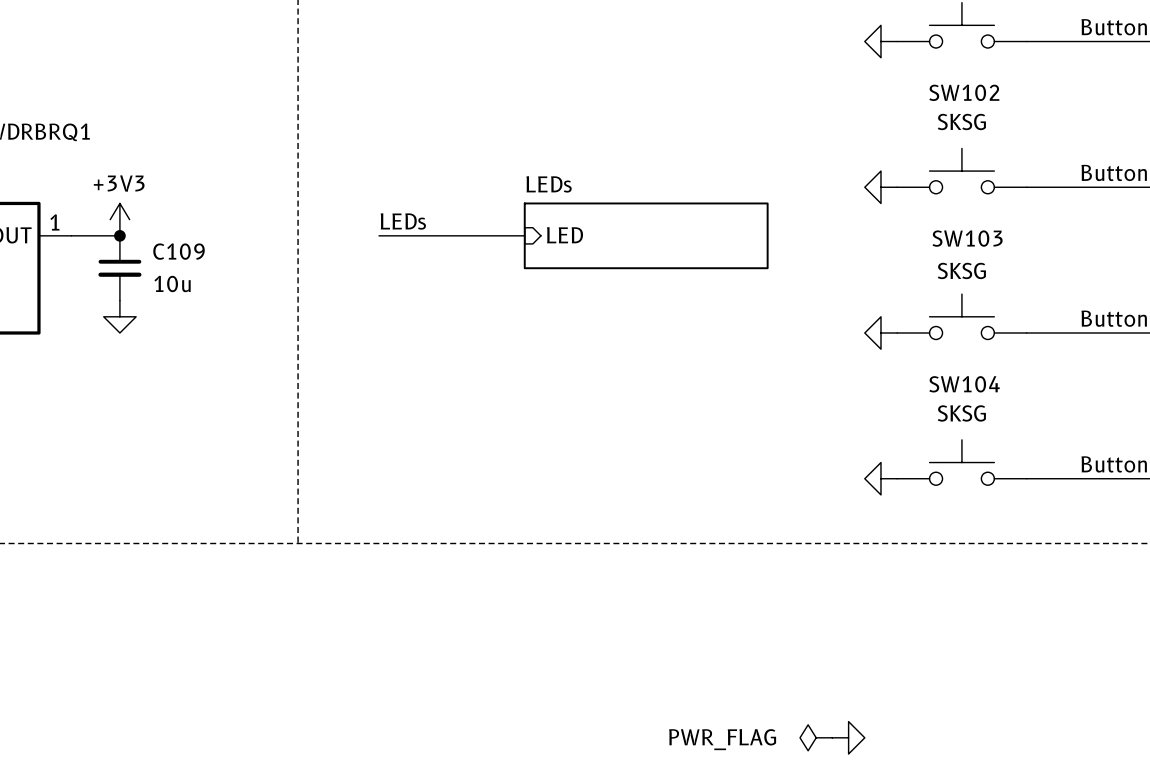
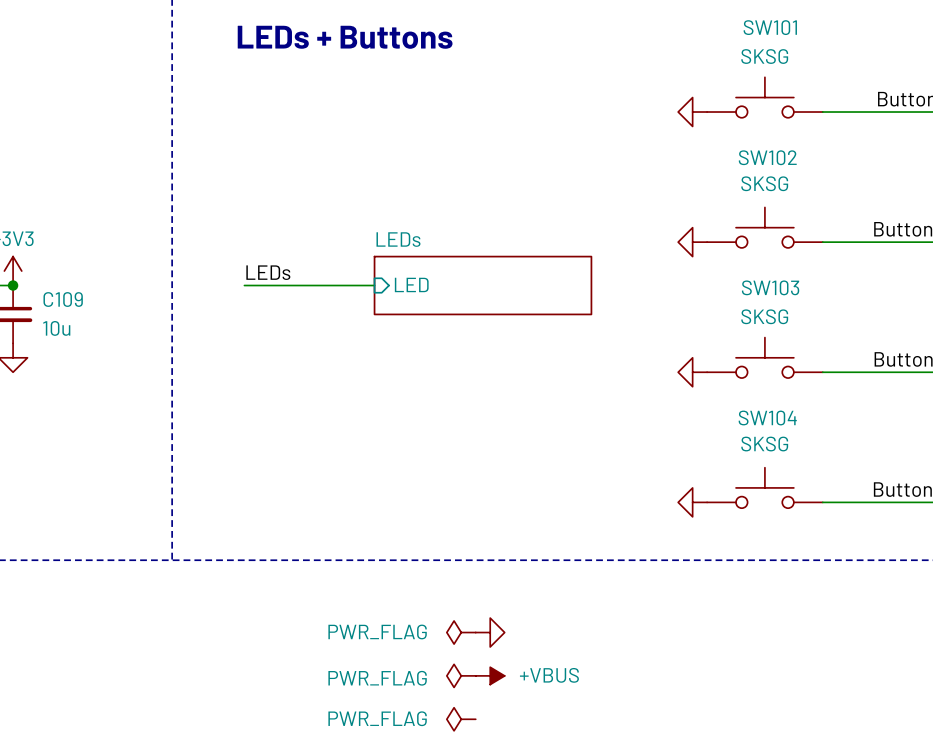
power symbol: none -> PWR_FLAG (461, 632)
power symbol: none -> (490, 632)
power symbol: none -> PWR_FLAG (461, 675)
power symbol: none -> +VBUS (490, 675)
power symbol: none -> PWR_FLAG (461, 719)
power symbol: PWR_FLAG (816, 737) -> none
power symbol: (848, 737) -> none

